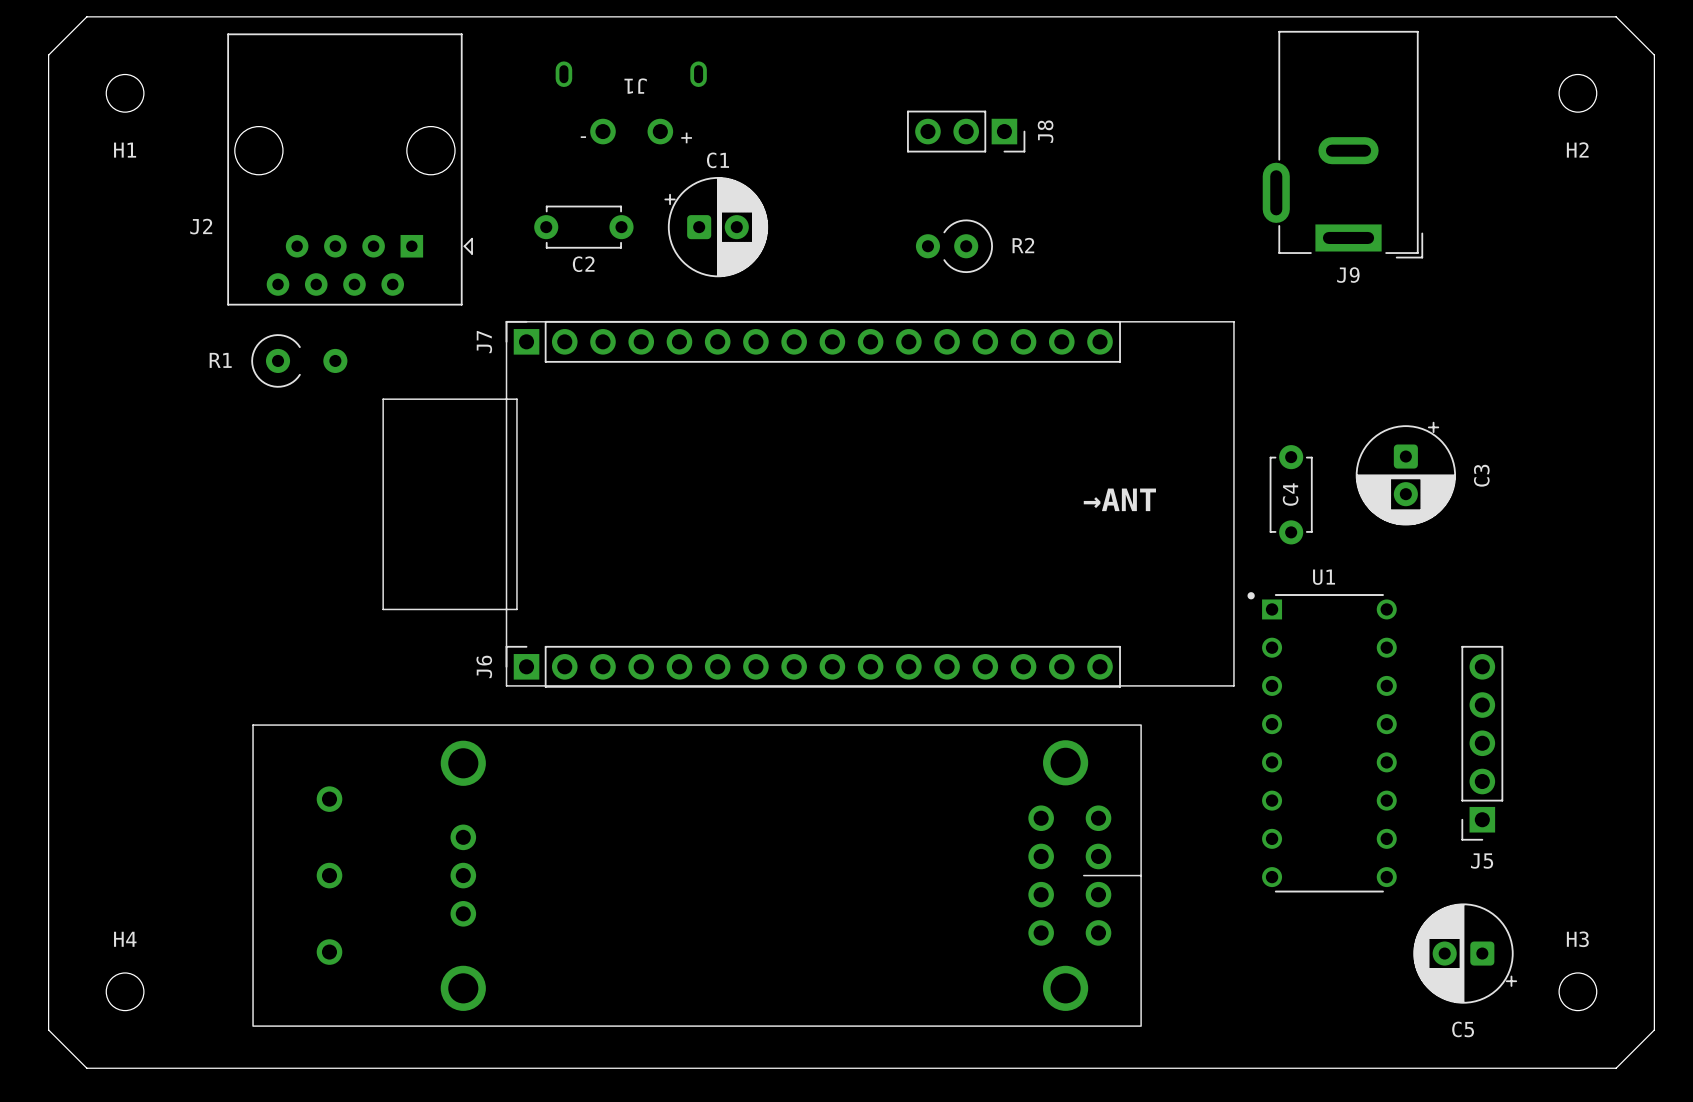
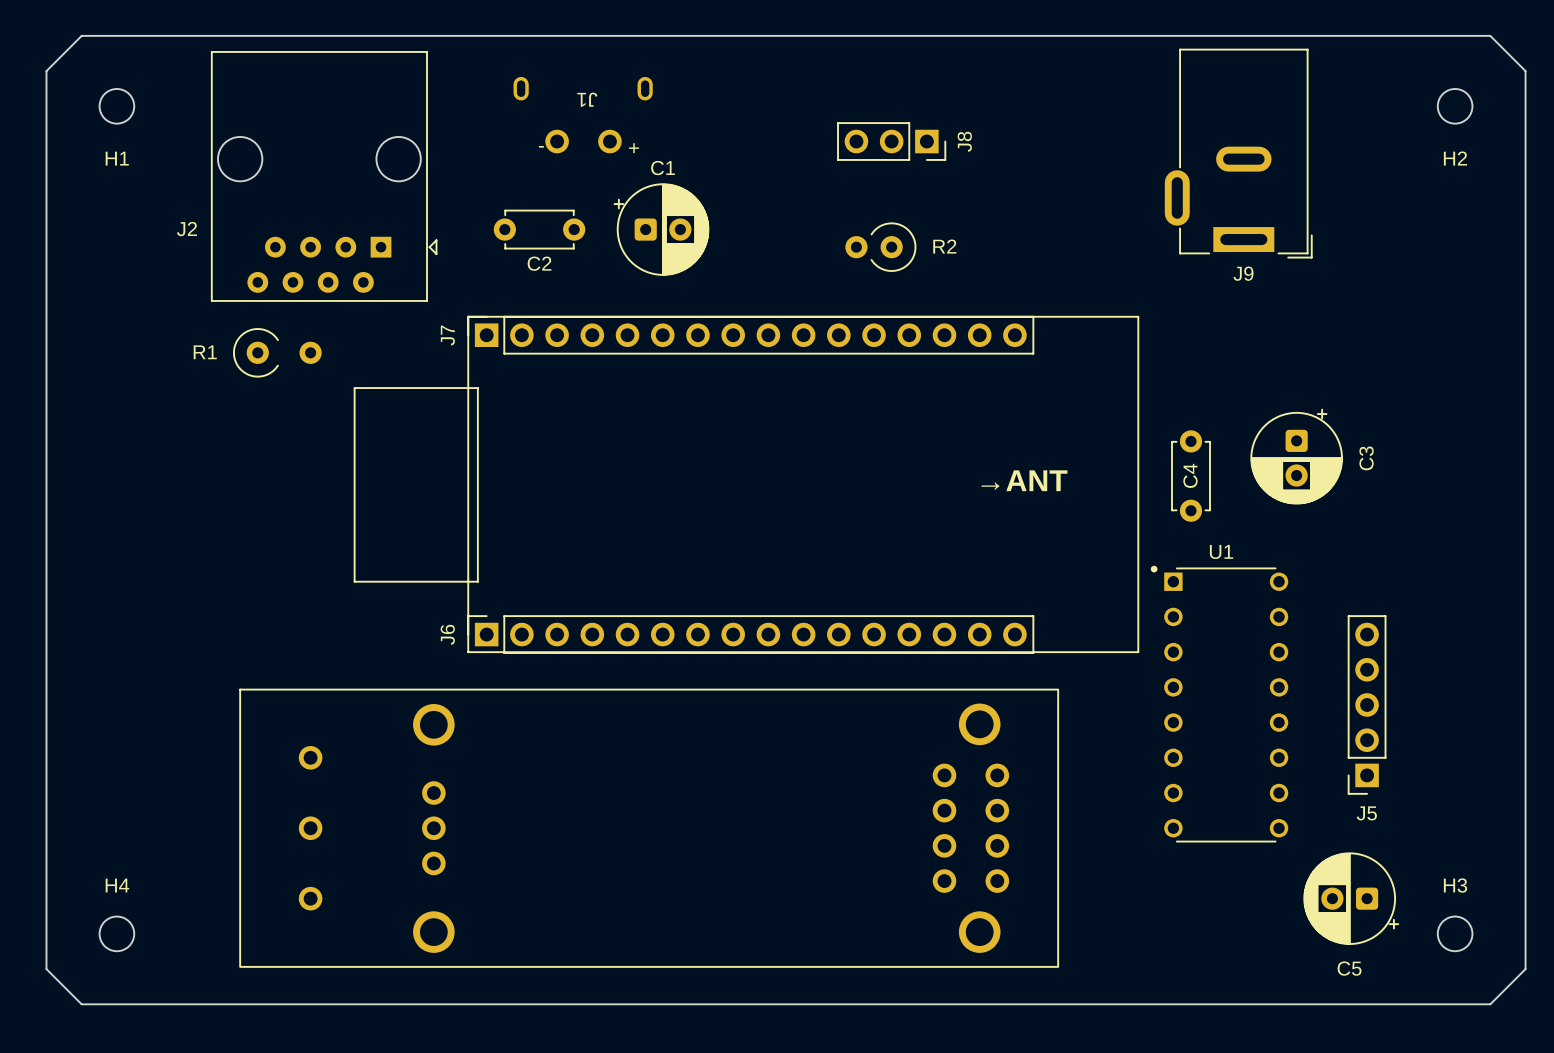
part footprint: [252, 724, 1142, 1027] -> [239, 688, 1059, 968]

